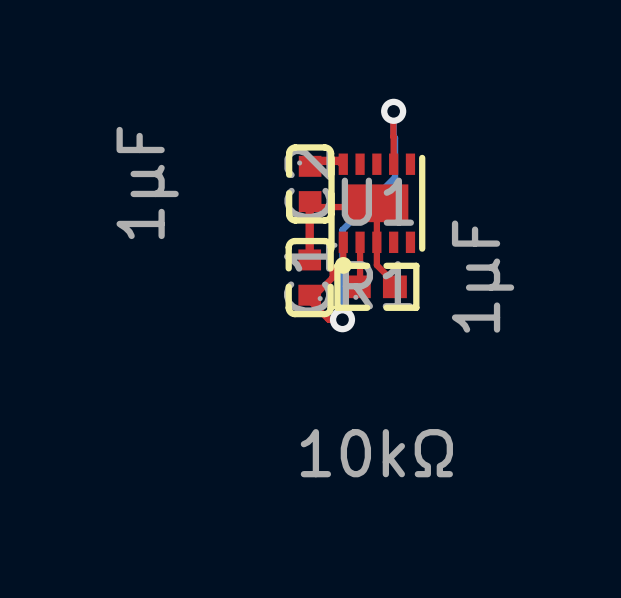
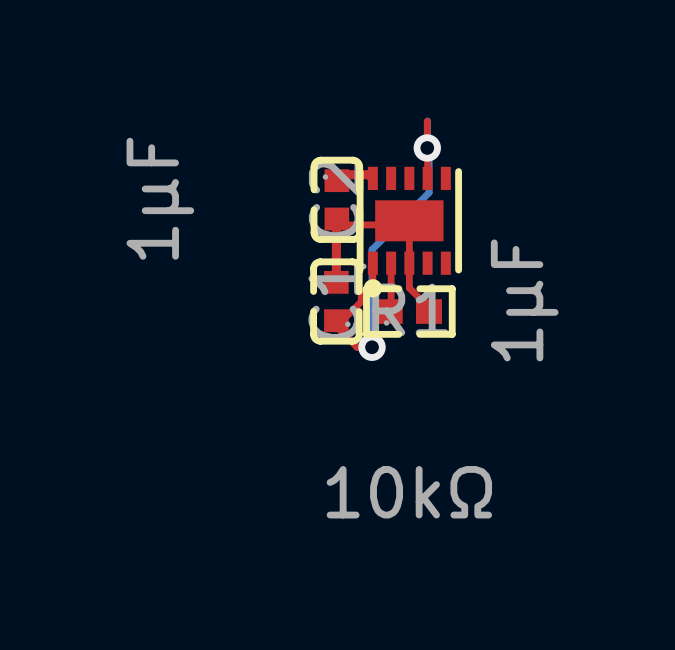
via position: (393, 111) -> (427, 147)
U1 name: U1 (377, 201) -> none

